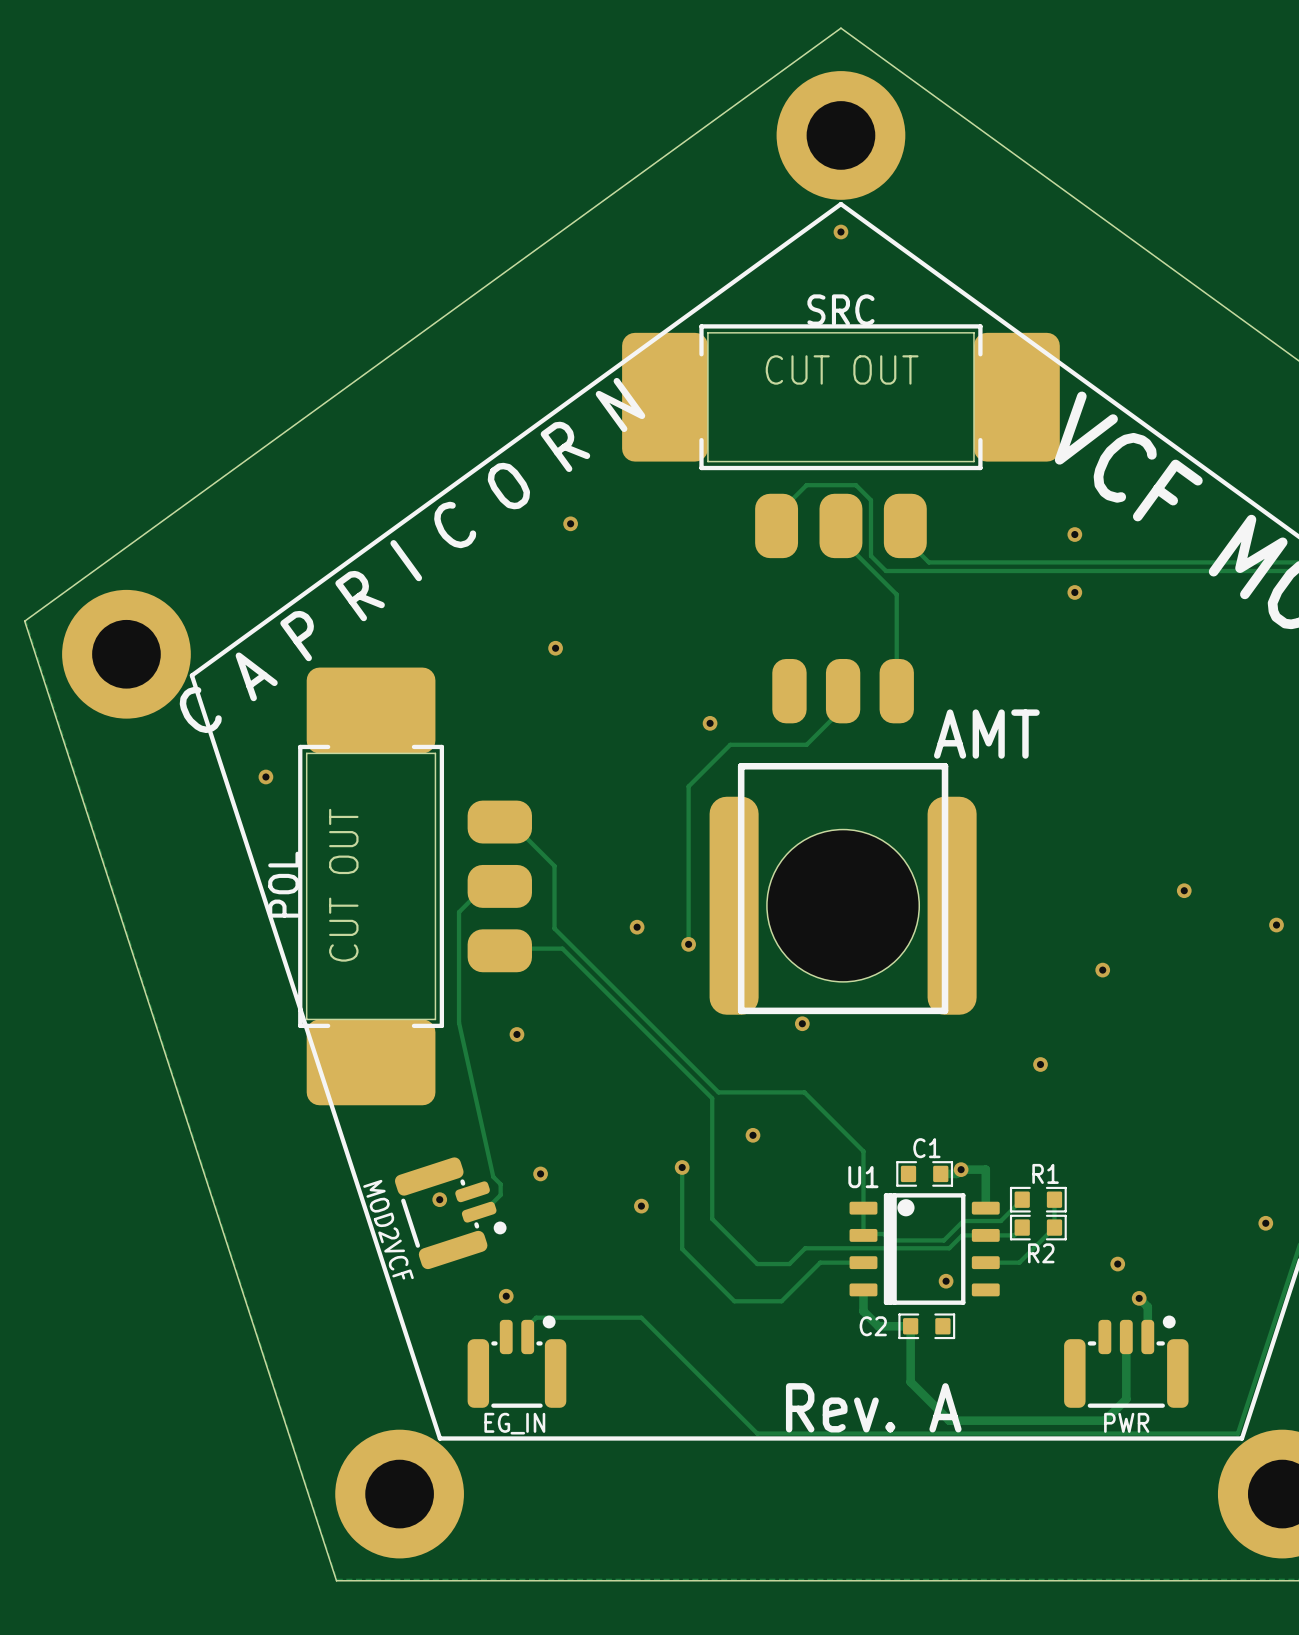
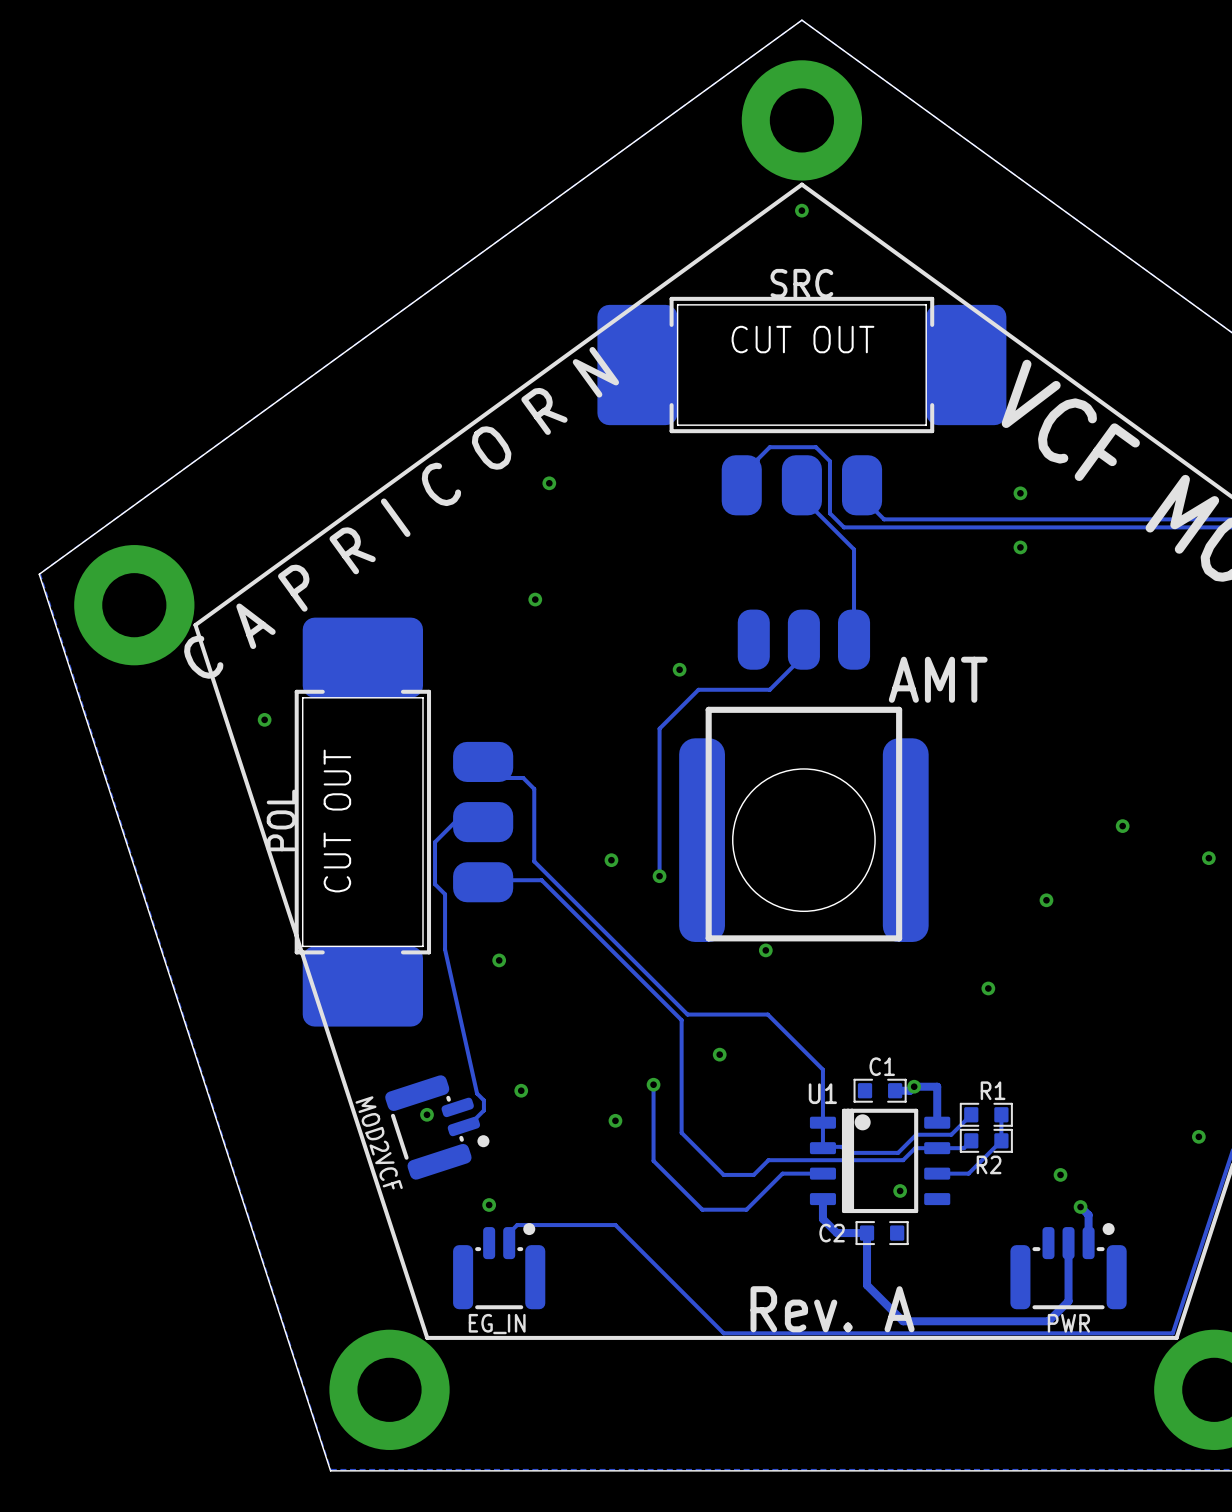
track: (499, 822) (510, 822) (554, 866) -> (465, 777) (523, 777) (534, 789) (534, 803)
track: (499, 886) (484, 886) (459, 912) (459, 963) -> (465, 822) (455, 822) (435, 842) (435, 884) (445, 894)

